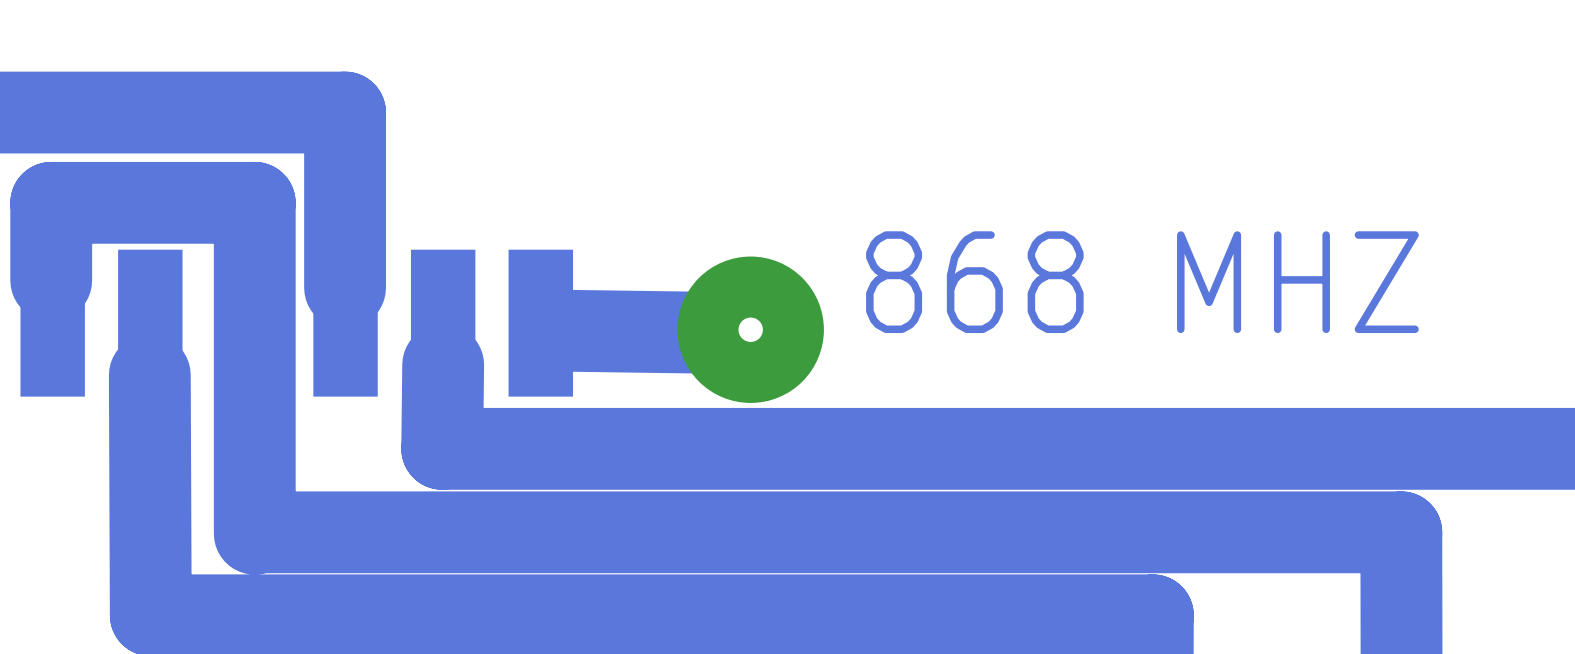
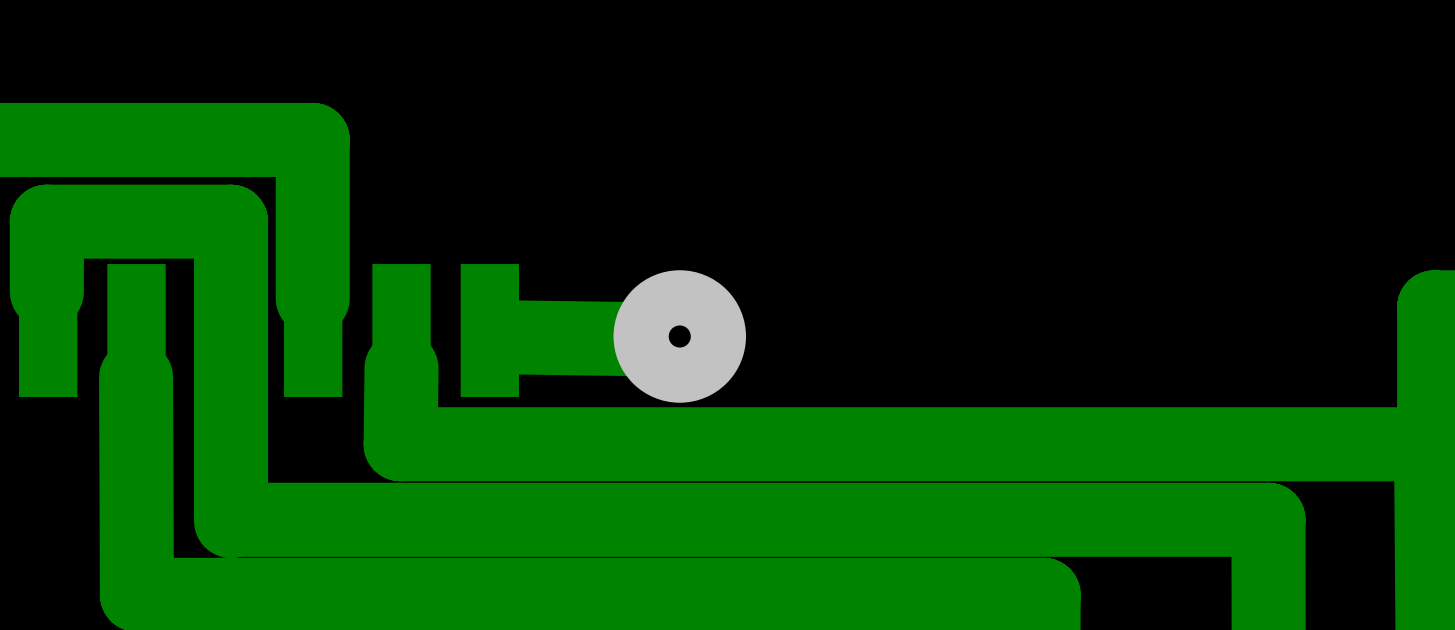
text: 868 MHZ (1142, 282) -> none

